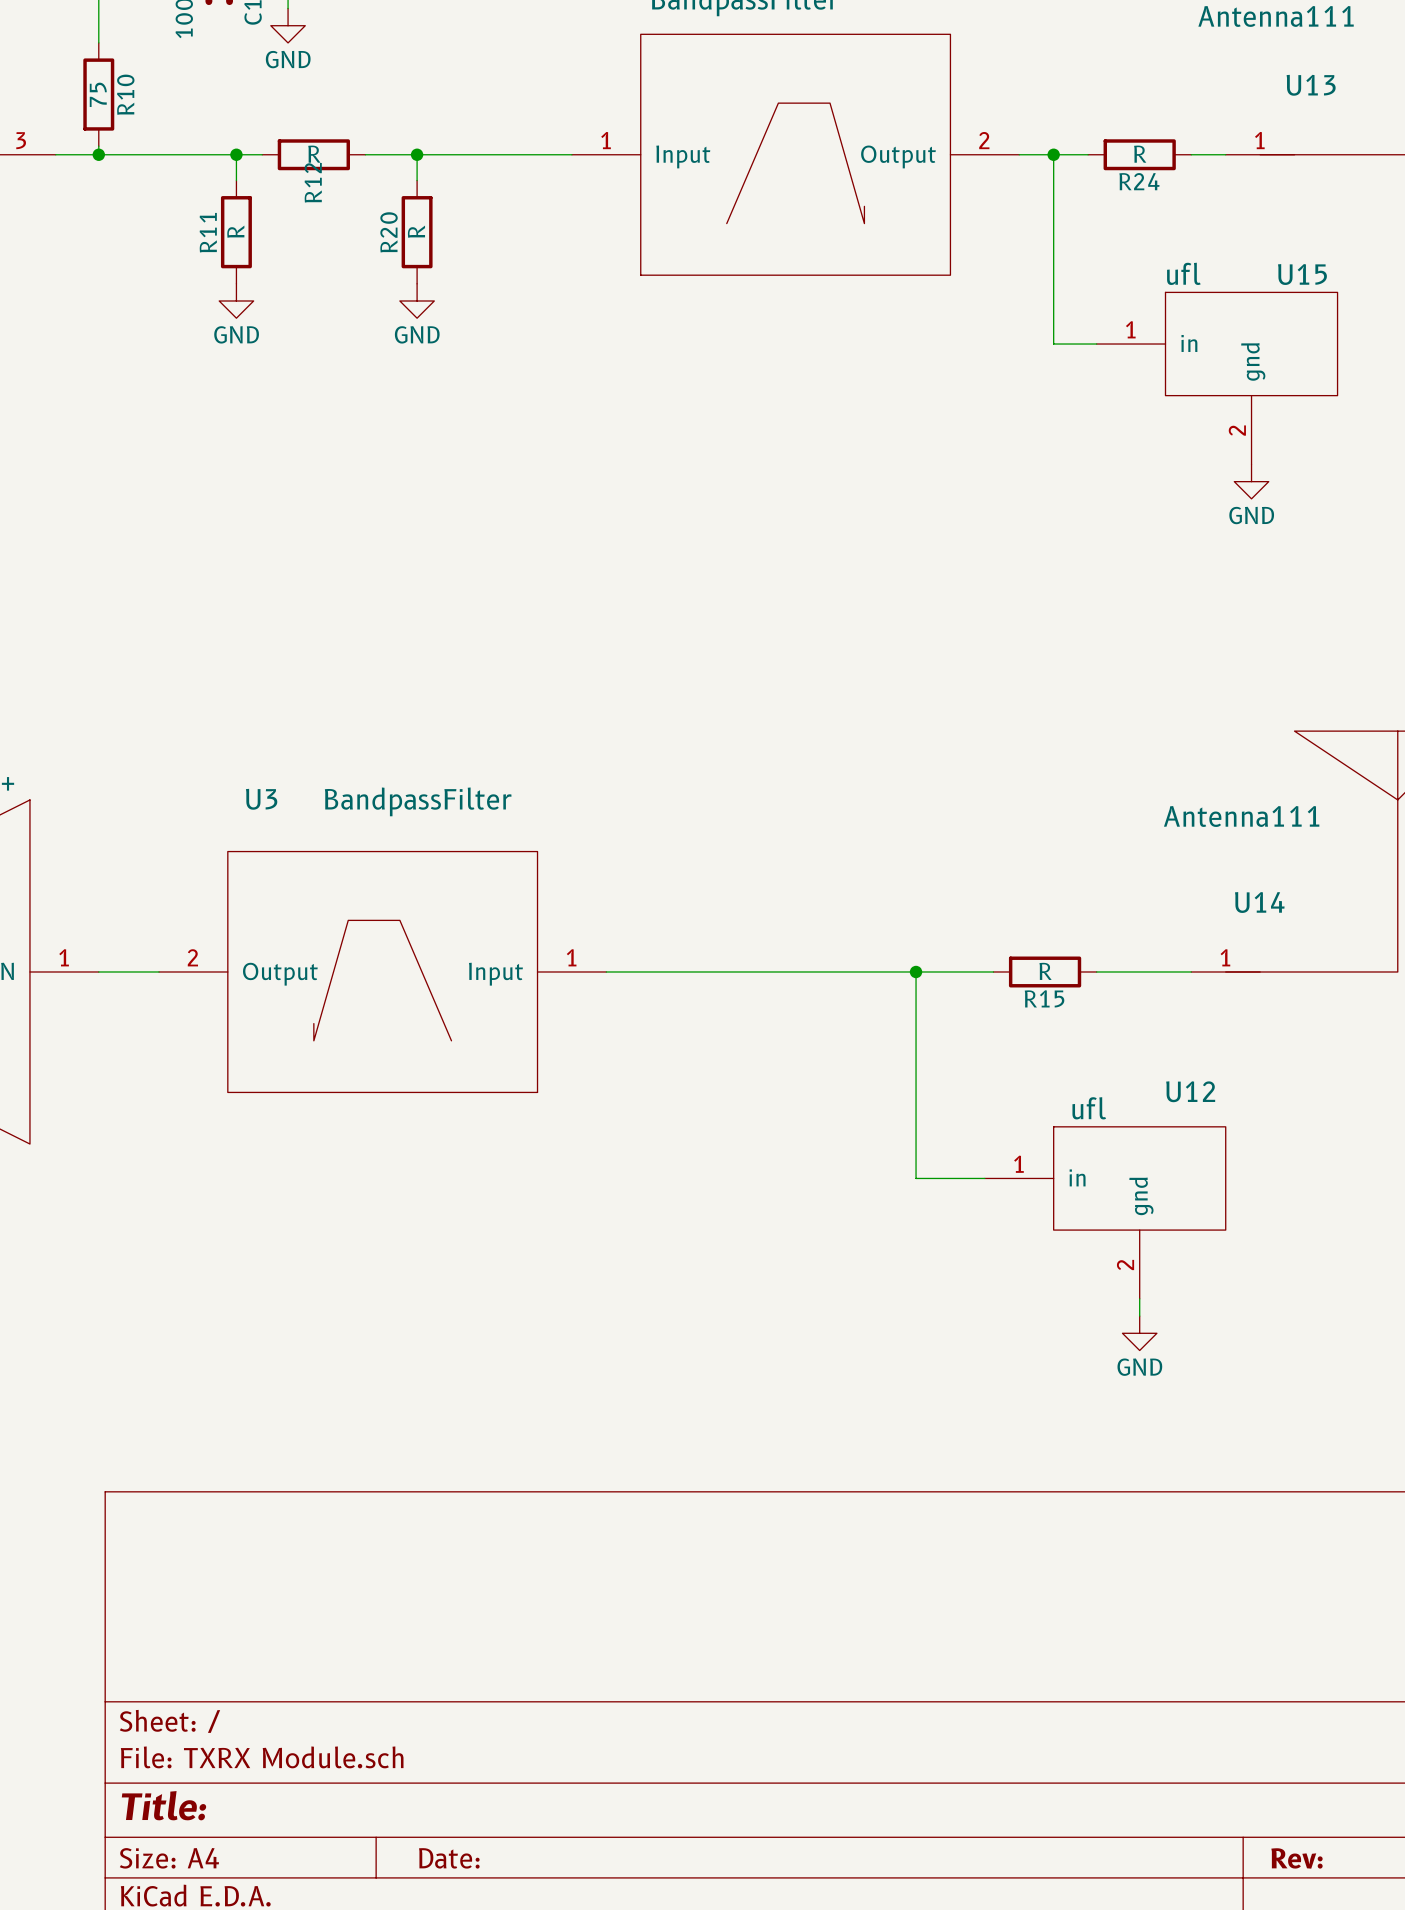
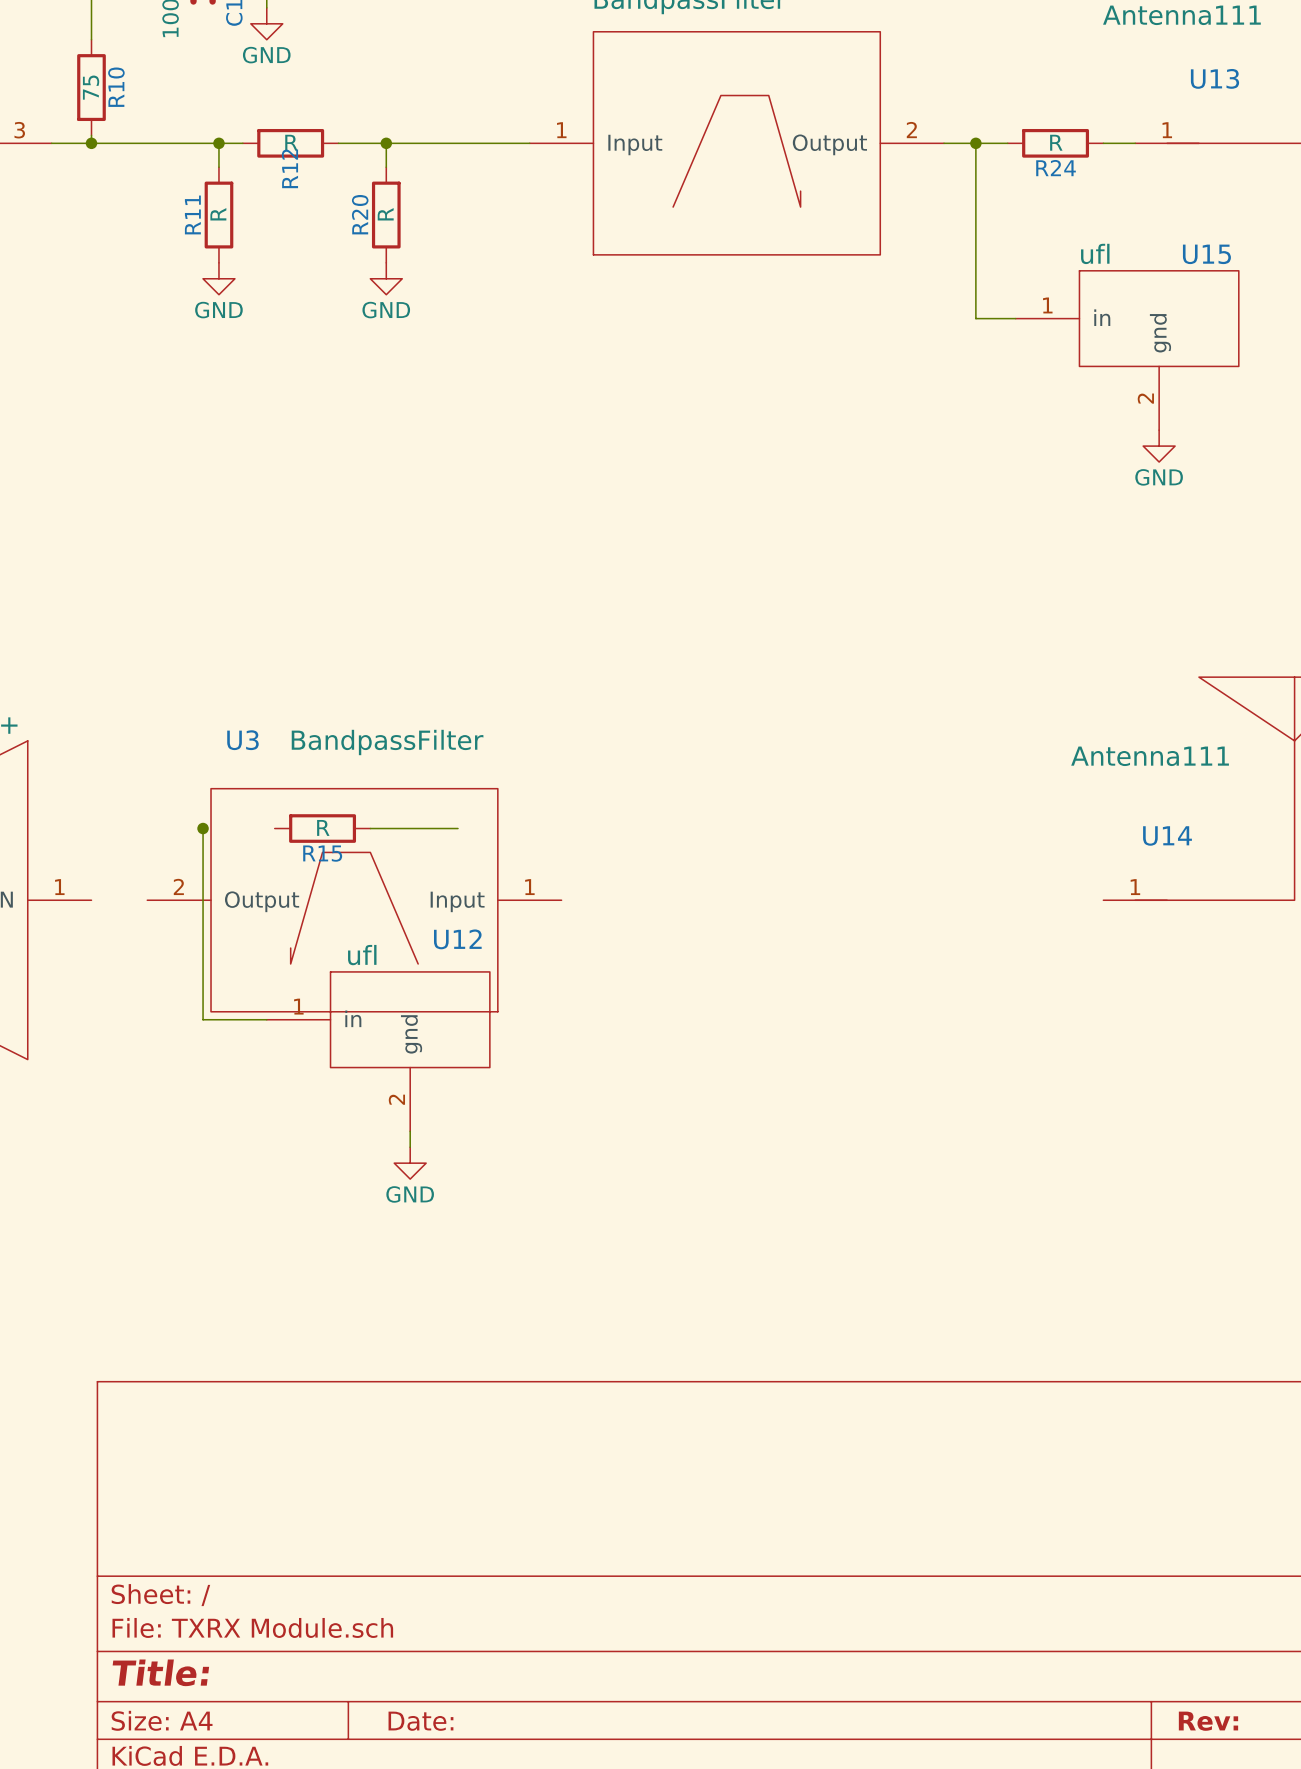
wire: none -> (203, 828) (203, 1019) (266, 1019)
junction: none -> (203, 828)
wire: none -> (370, 828) (458, 828)
wire: (98, 971) (159, 971) -> none
wire: (606, 971) (993, 971) -> none
wire: (916, 971) (916, 1178) (984, 1178) -> none
junction: (916, 971) -> none
R15 position: (1045, 971) -> (322, 828)
wire: (1096, 971) (1191, 971) -> none
U12 position: (1105, 1212) -> (378, 1051)
wire: none -> (410, 1131) (410, 1147)
power symbol: none -> GND (410, 1163)
wire: (1139, 1298) (1139, 1316) -> none
power symbol: GND (1139, 1333) -> none

